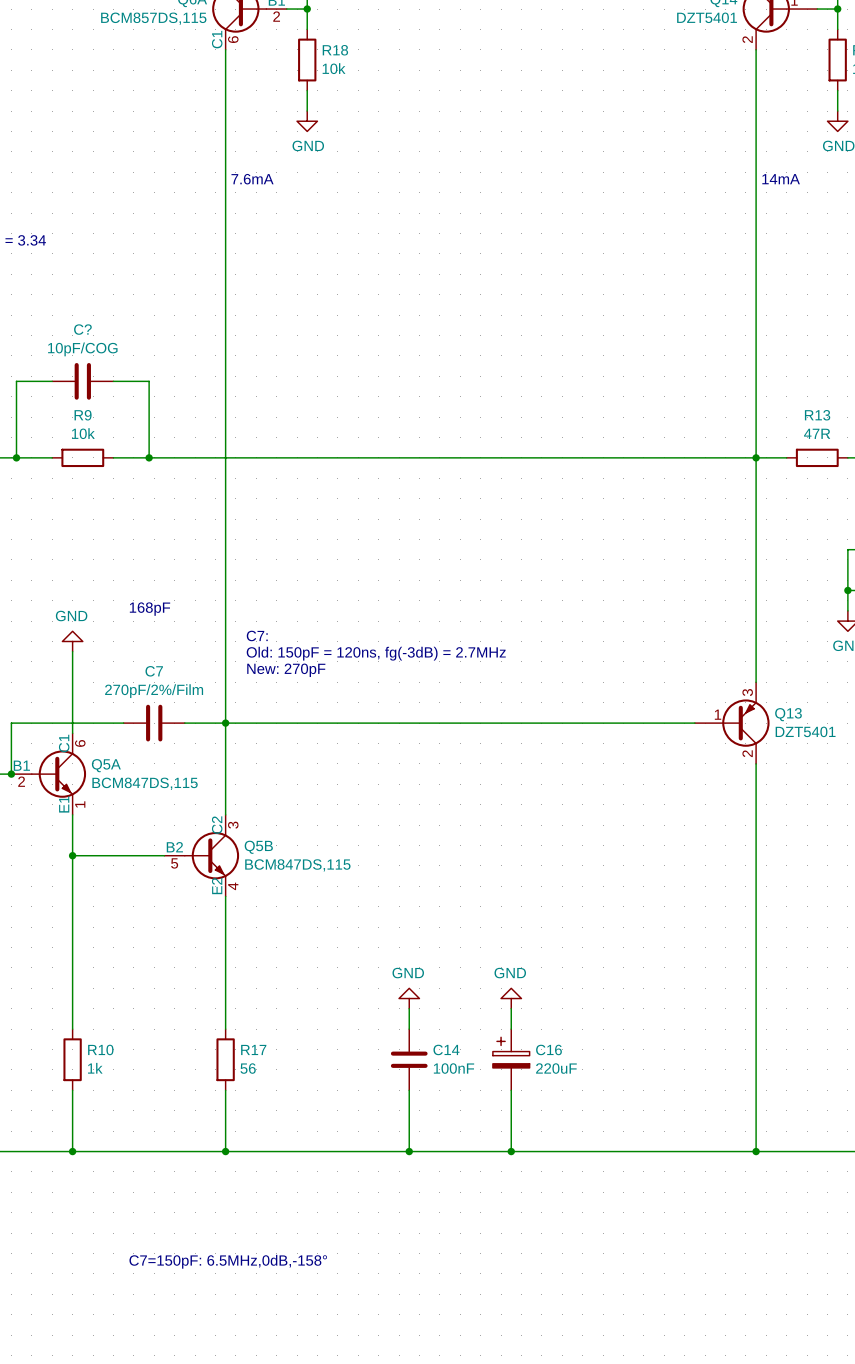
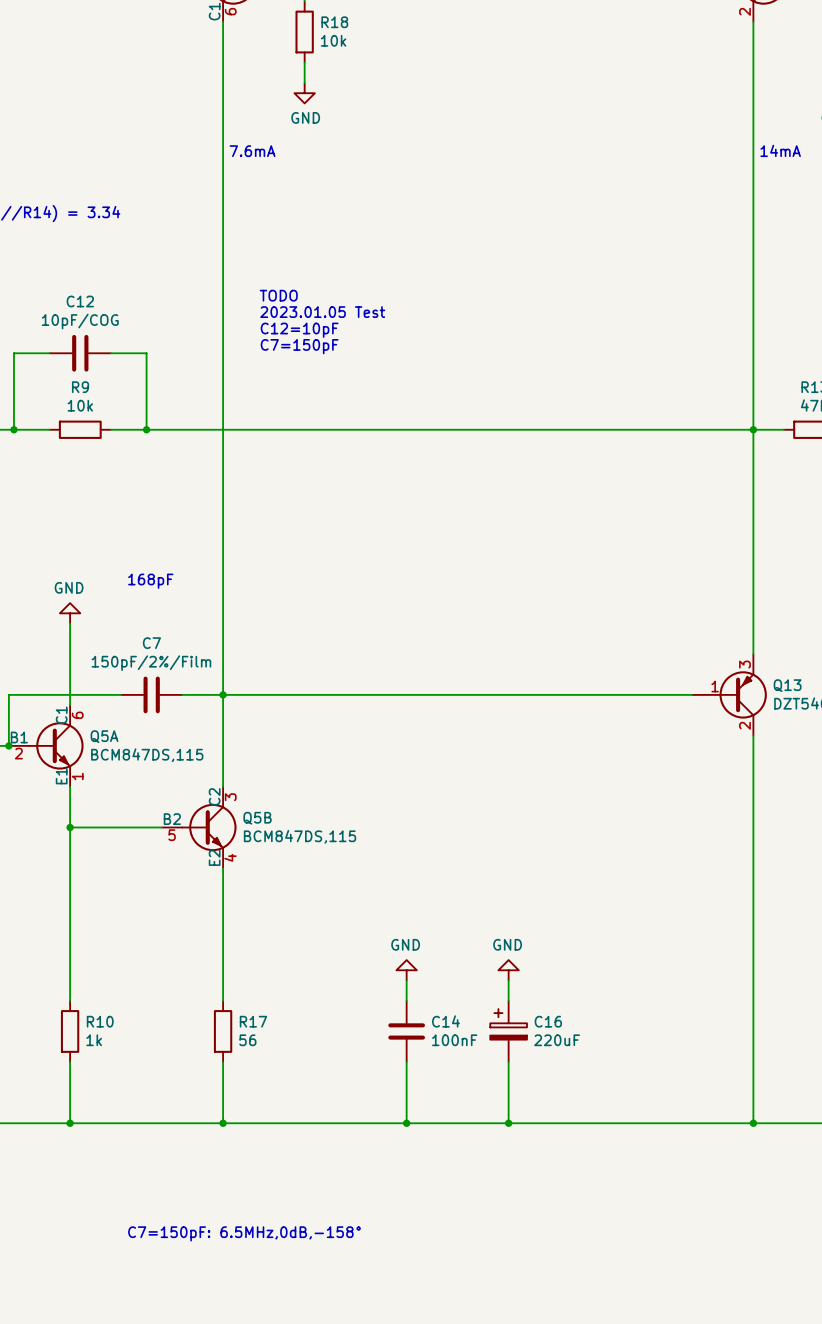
text: none -> TODO (278, 295)
C? name: C? (82, 329) -> C12 (80, 301)
text: none -> 2023.01.05 Test (322, 312)
text: none -> C12=10pF (299, 330)
text: none -> C7=150pF (299, 346)
text: C7: (257, 635) -> none
text: Old: 150pF = 120ns, fg(-3dB) = 2.7MHz (376, 653) -> none
text: New: 270pF (286, 670) -> none
C7 value: 270pF/2%/Film (154, 691) -> 150pF/2%/Film (151, 663)

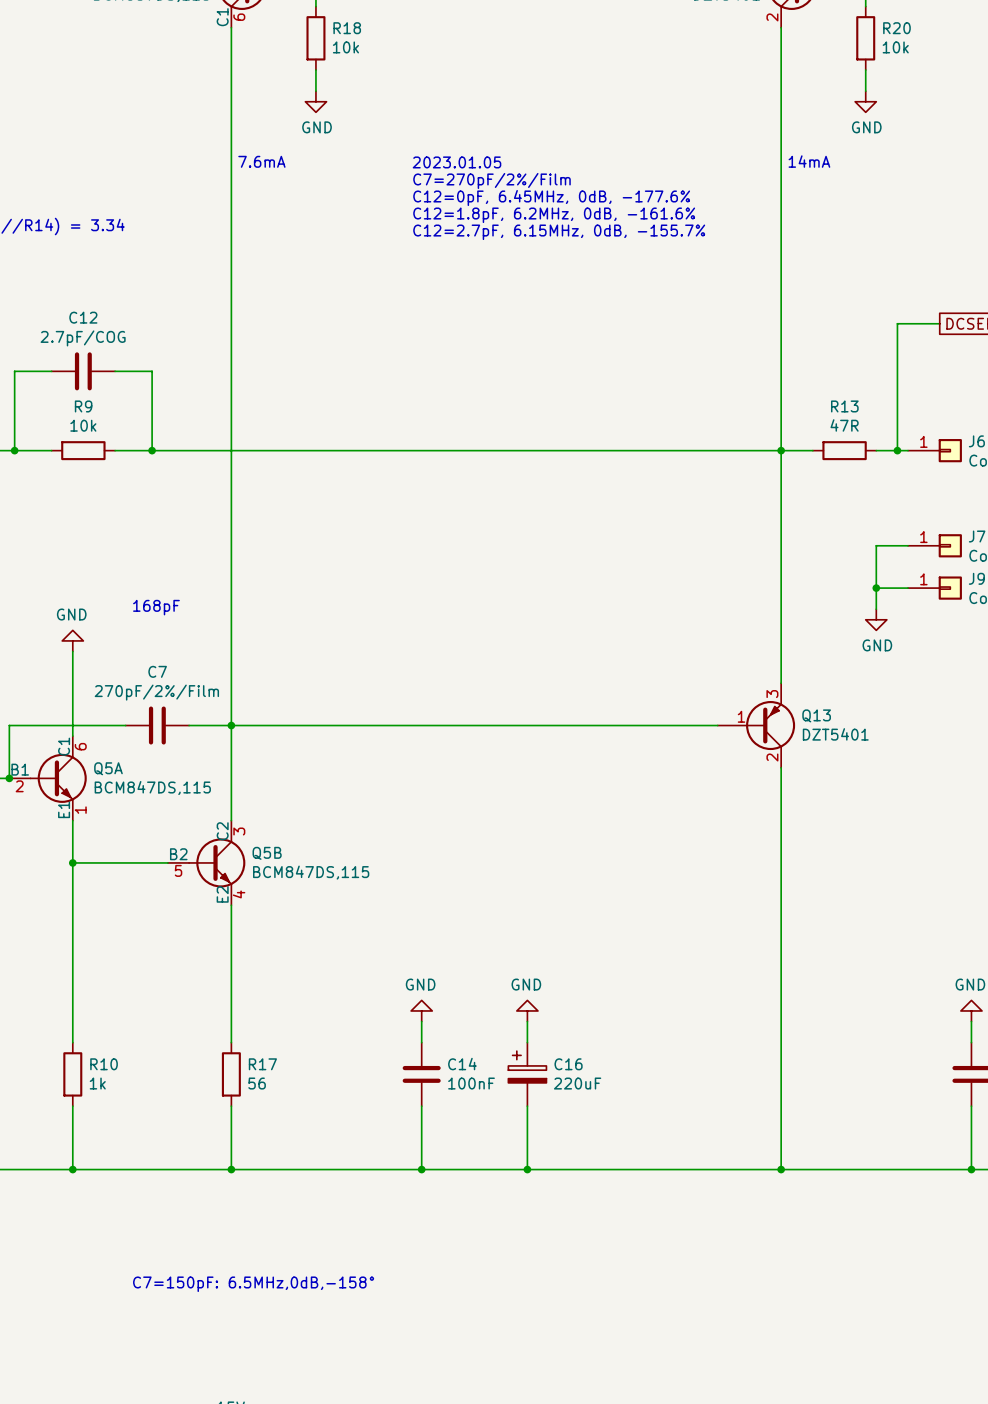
text: none -> 2023.01.05 (457, 162)
text: none -> C7=270pF/2%/Film (492, 180)
text: none -> C12=0pF, 6.45MHz, 0dB, -177.6% (551, 198)
text: none -> C12=1.8pF, 6.2MHz, 0dB, -161.6% (554, 215)
text: none -> C12=2.7pF, 6.15MHz, 0dB, -155.7% (559, 232)
text: TODO (278, 295) -> none
text: 2023.01.05 Test (322, 312) -> none
C12 value: 10pF/COG (80, 321) -> 2.7pF/COG (83, 338)
text: C12=10pF (299, 330) -> none
text: C7=150pF (299, 346) -> none
C7 value: 150pF/2%/Film (151, 663) -> 270pF/2%/Film (156, 692)

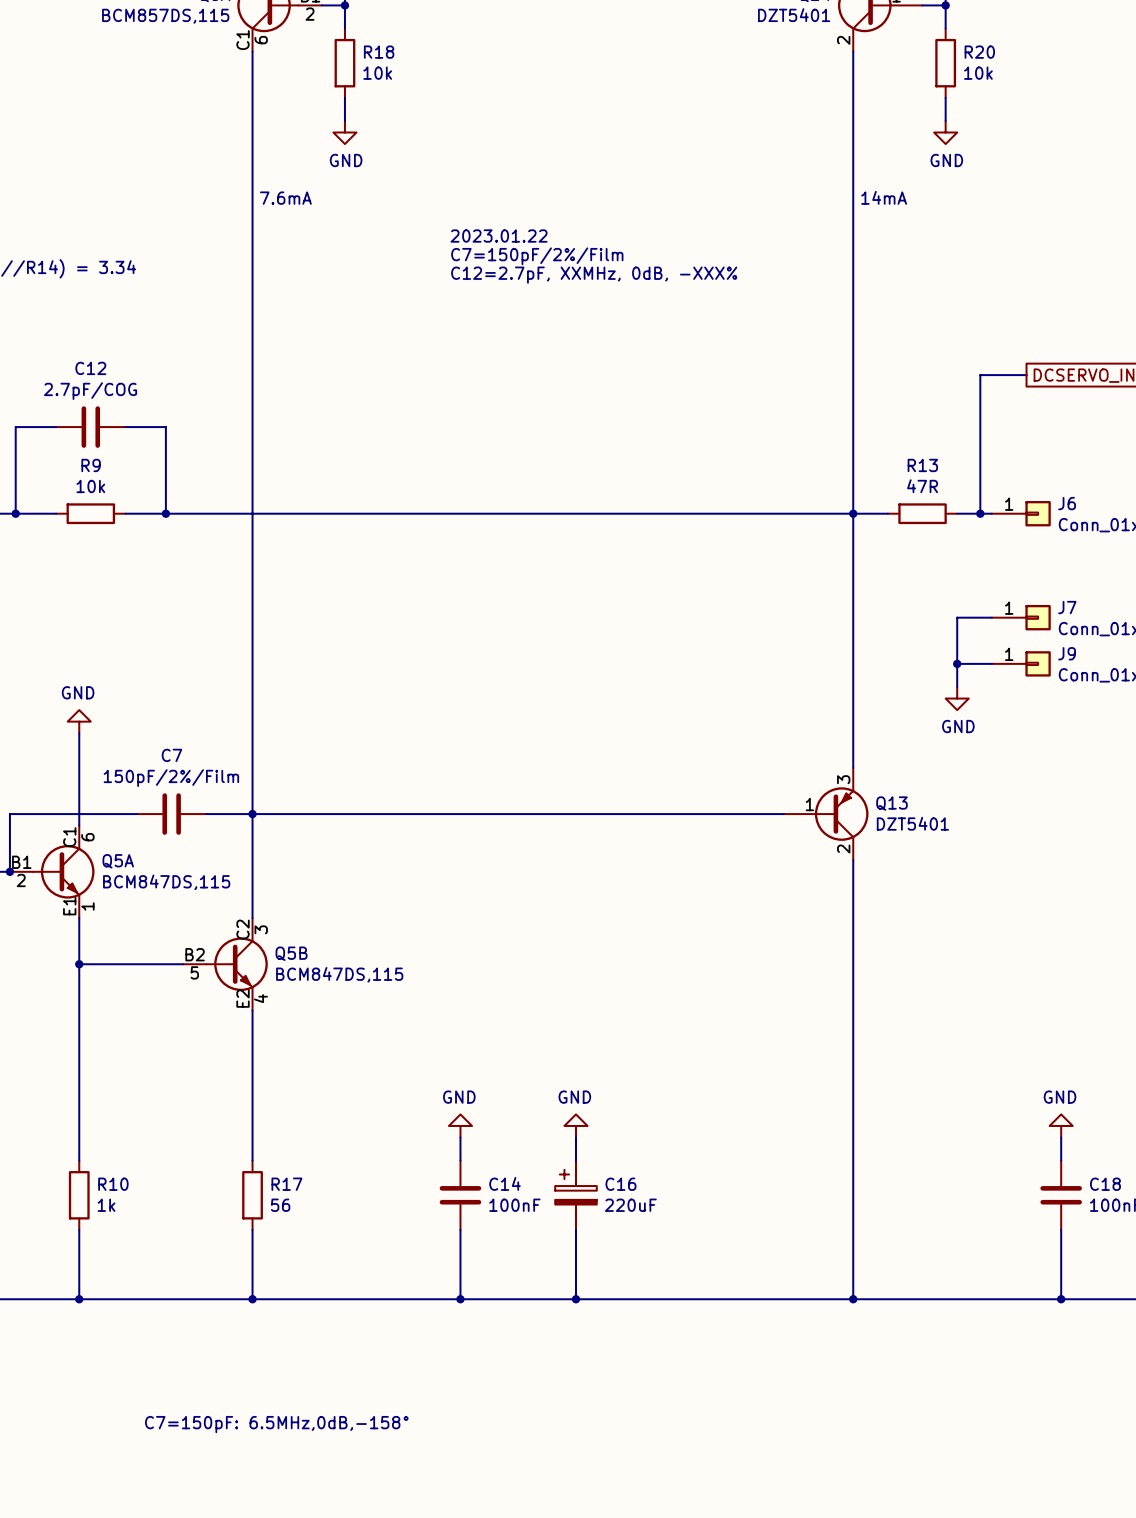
text: 2023.01.05 (457, 162) -> none
text: C7=270pF/2%/Film (492, 180) -> none
text: C12=0pF, 6.45MHz, 0dB, -177.6% (551, 198) -> 2023.01.22 (499, 236)
text: C12=1.8pF, 6.2MHz, 0dB, -161.6% (554, 215) -> C7=150pF/2%/Film (537, 256)
text: C12=2.7pF, 6.15MHz, 0dB, -155.7% (559, 232) -> C12=2.7pF, XXMHz, 0dB, -XXX% (594, 275)
text: 168pF (156, 607) -> none
C7 value: 270pF/2%/Film (156, 692) -> 150pF/2%/Film (171, 778)

